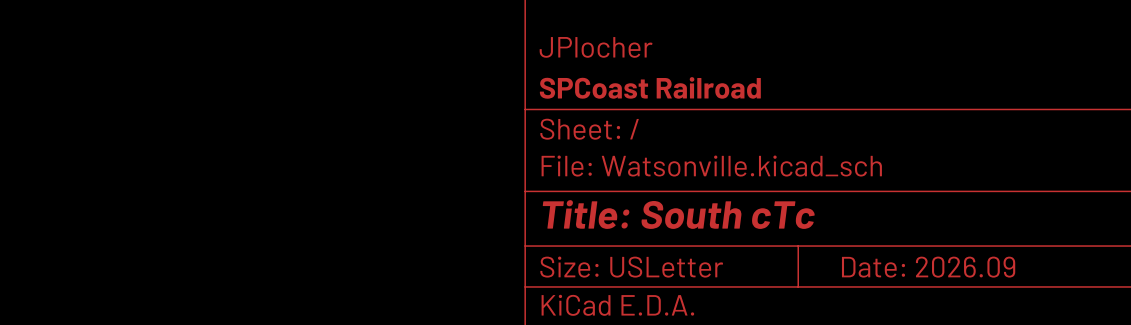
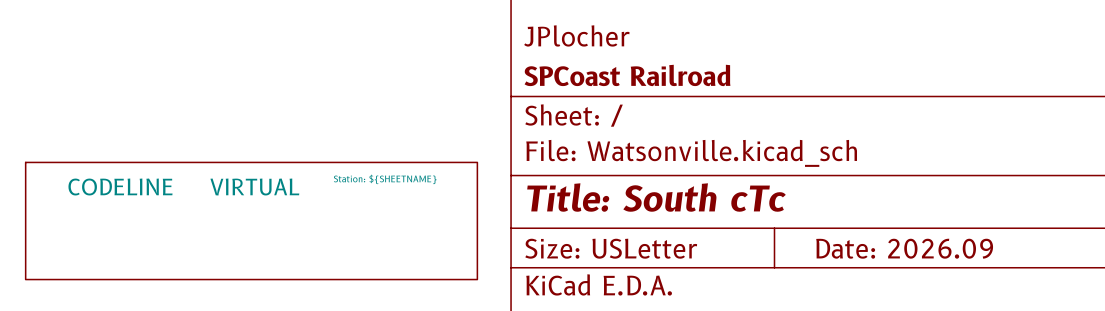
part: none -> VIRTUAL (251, 220)

